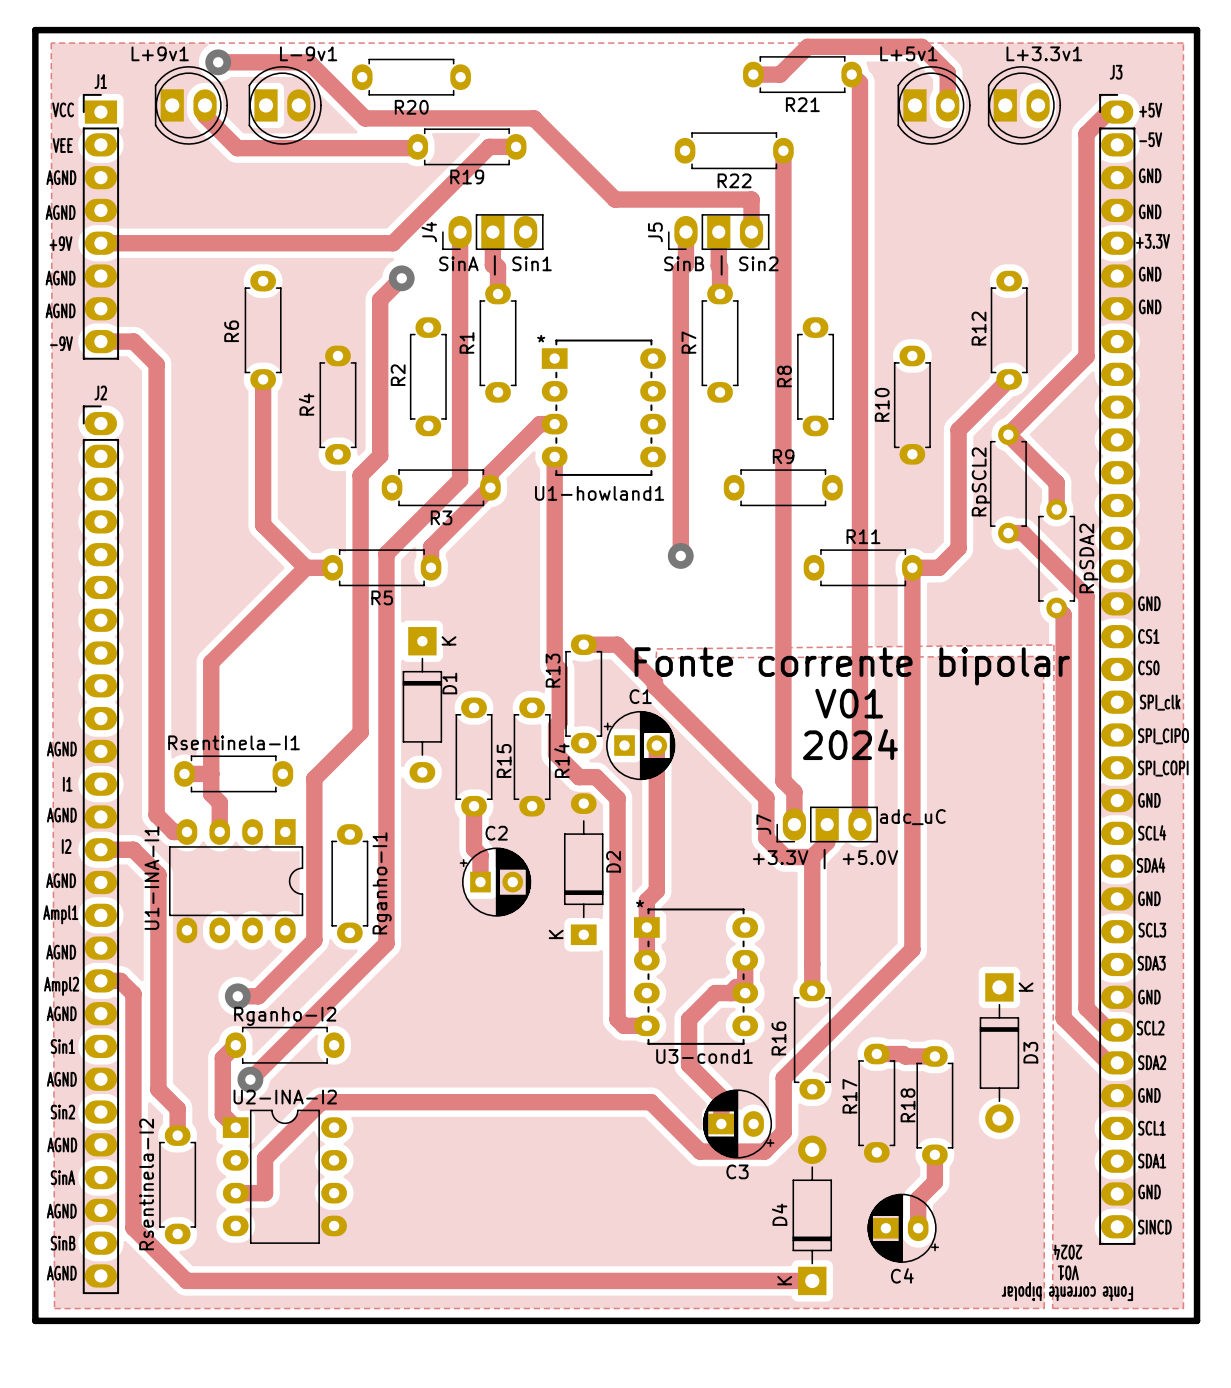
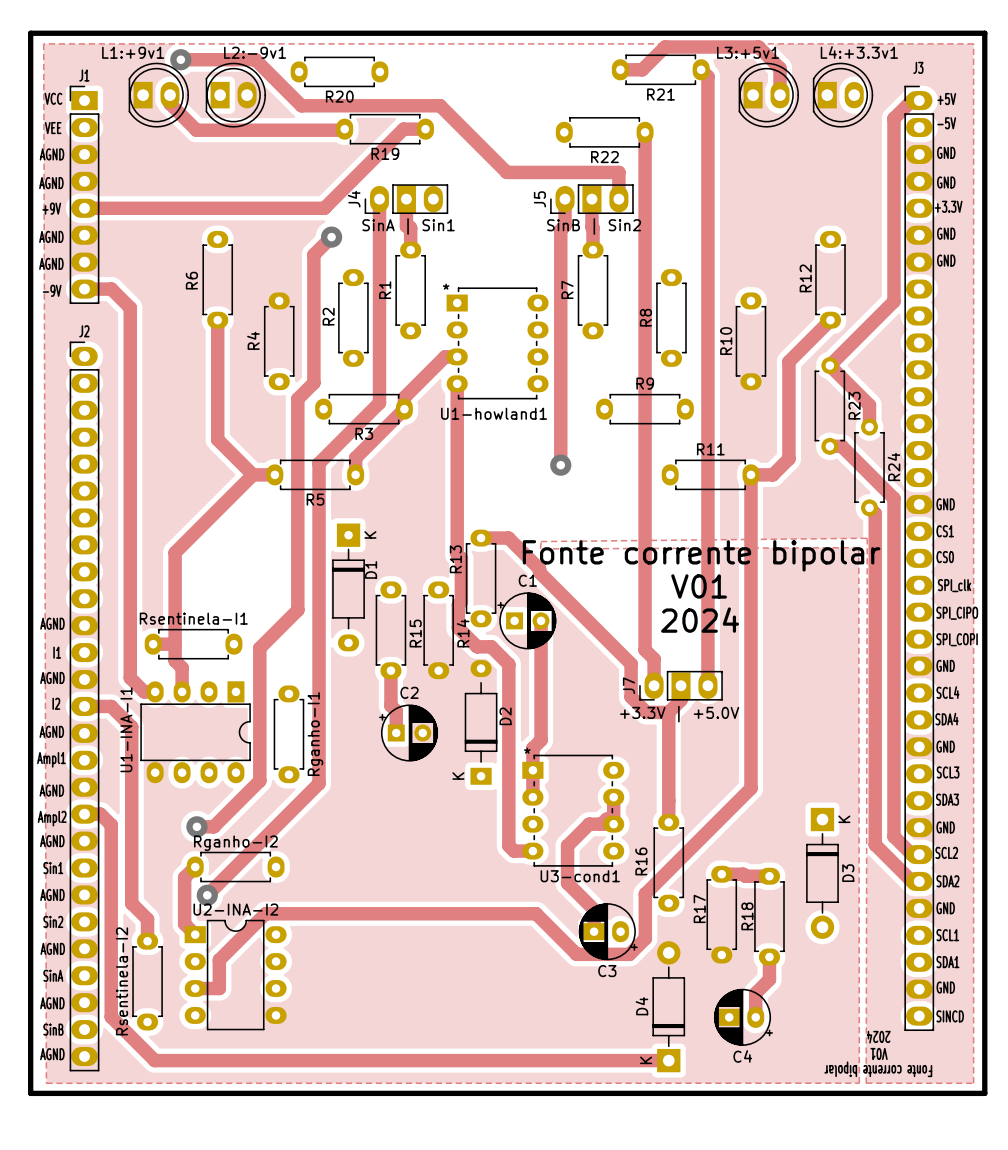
L+9v1 name: L+9v1 (160, 53) -> L1:+9v1 (133, 52)
L-9v1 name: L-9v1 (308, 53) -> L2:-9v1 (255, 52)
L+5v1 name: L+5v1 (908, 53) -> L3:+5v1 (748, 52)
L+3.3v1 name: L+3.3v1 (1044, 53) -> L4:+3.3v1 (859, 52)
RpSCL2 name: RpSCL2 (981, 481) -> R23 (854, 405)
RpSDA2 name: RpSDA2 (1088, 558) -> R24 (893, 466)
text: adc_uC (912, 817) -> none

